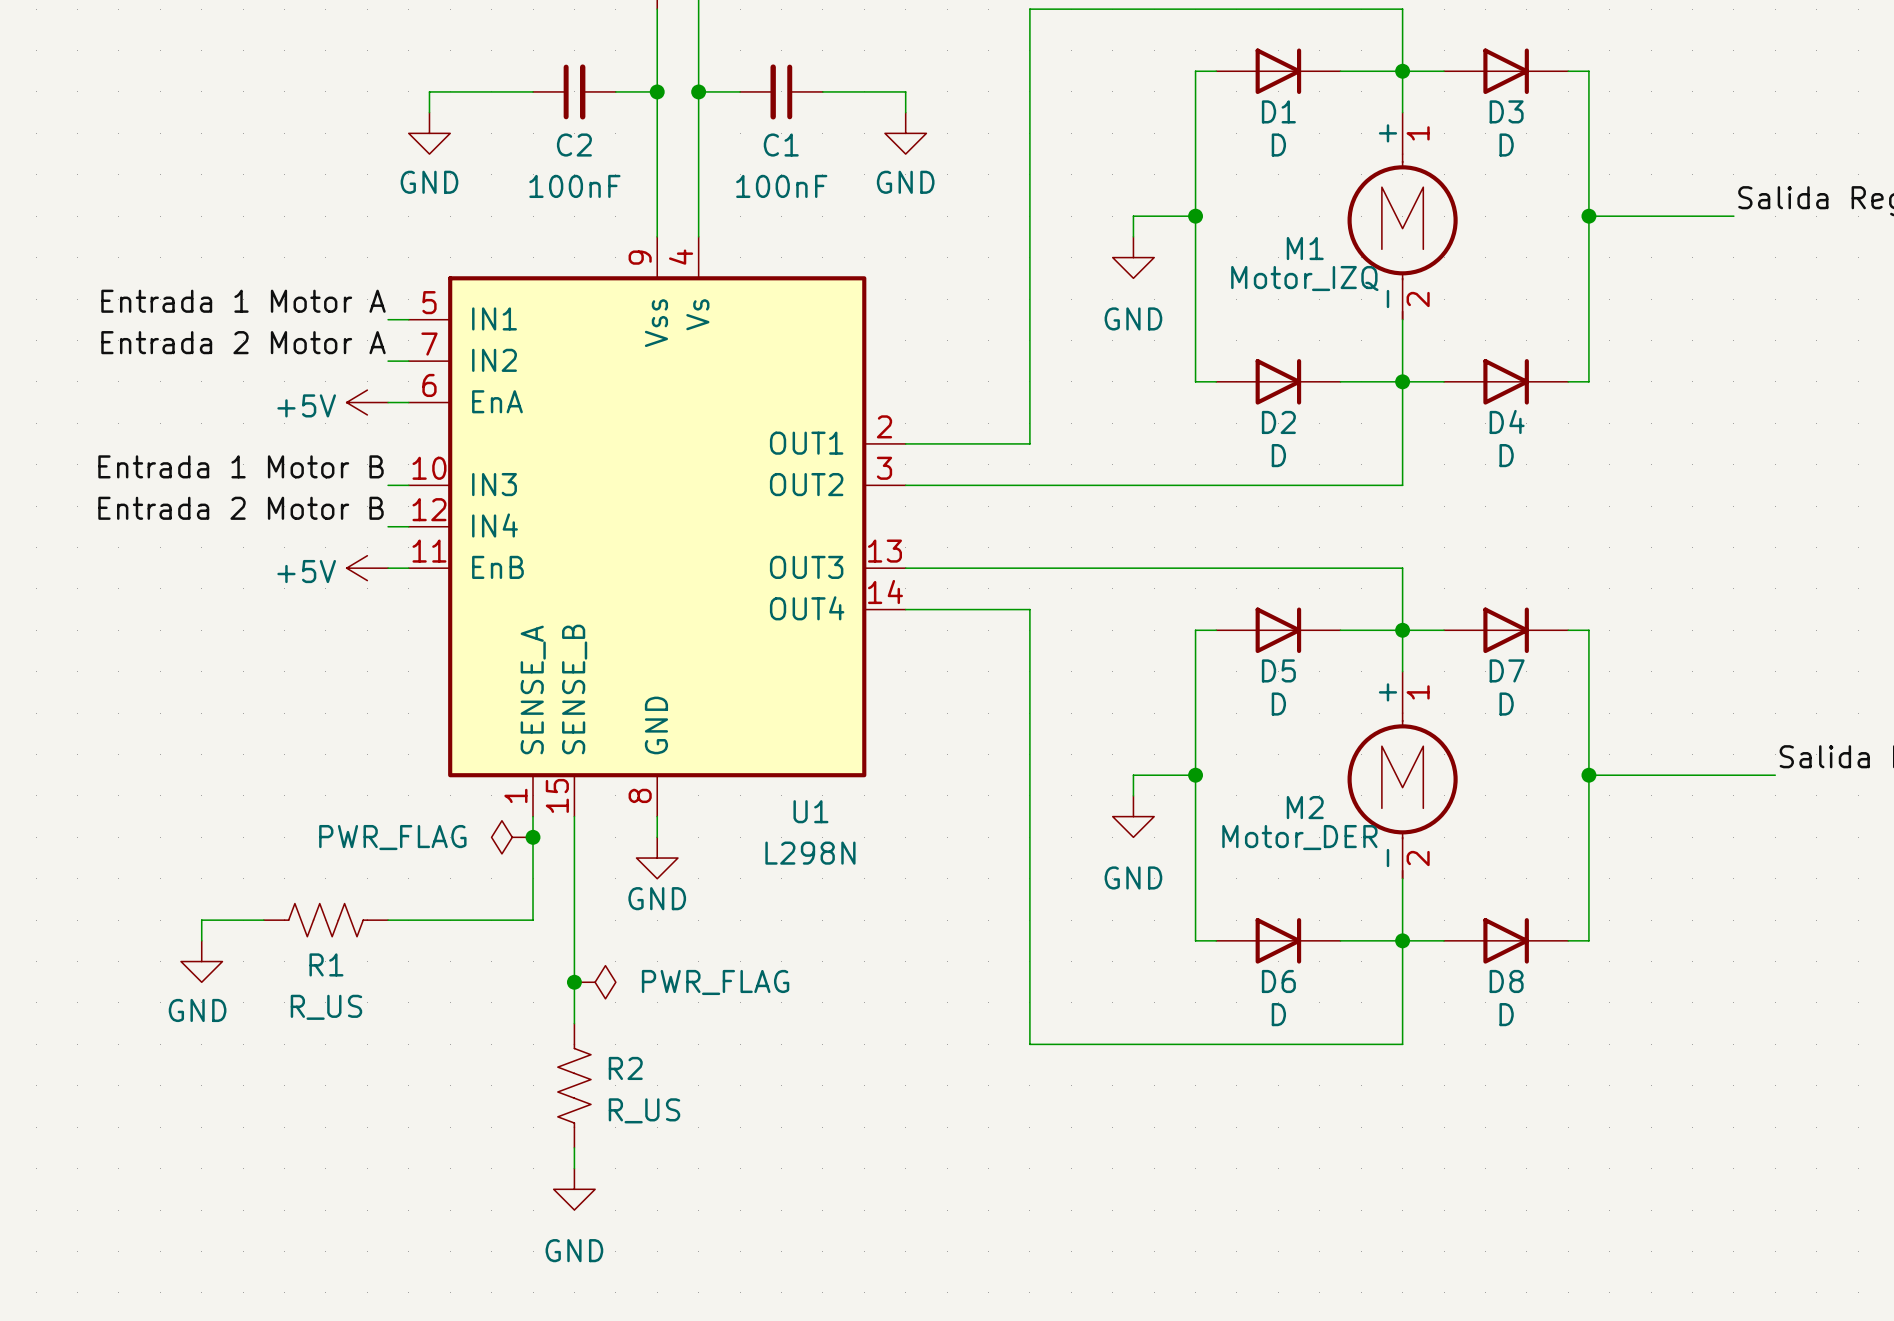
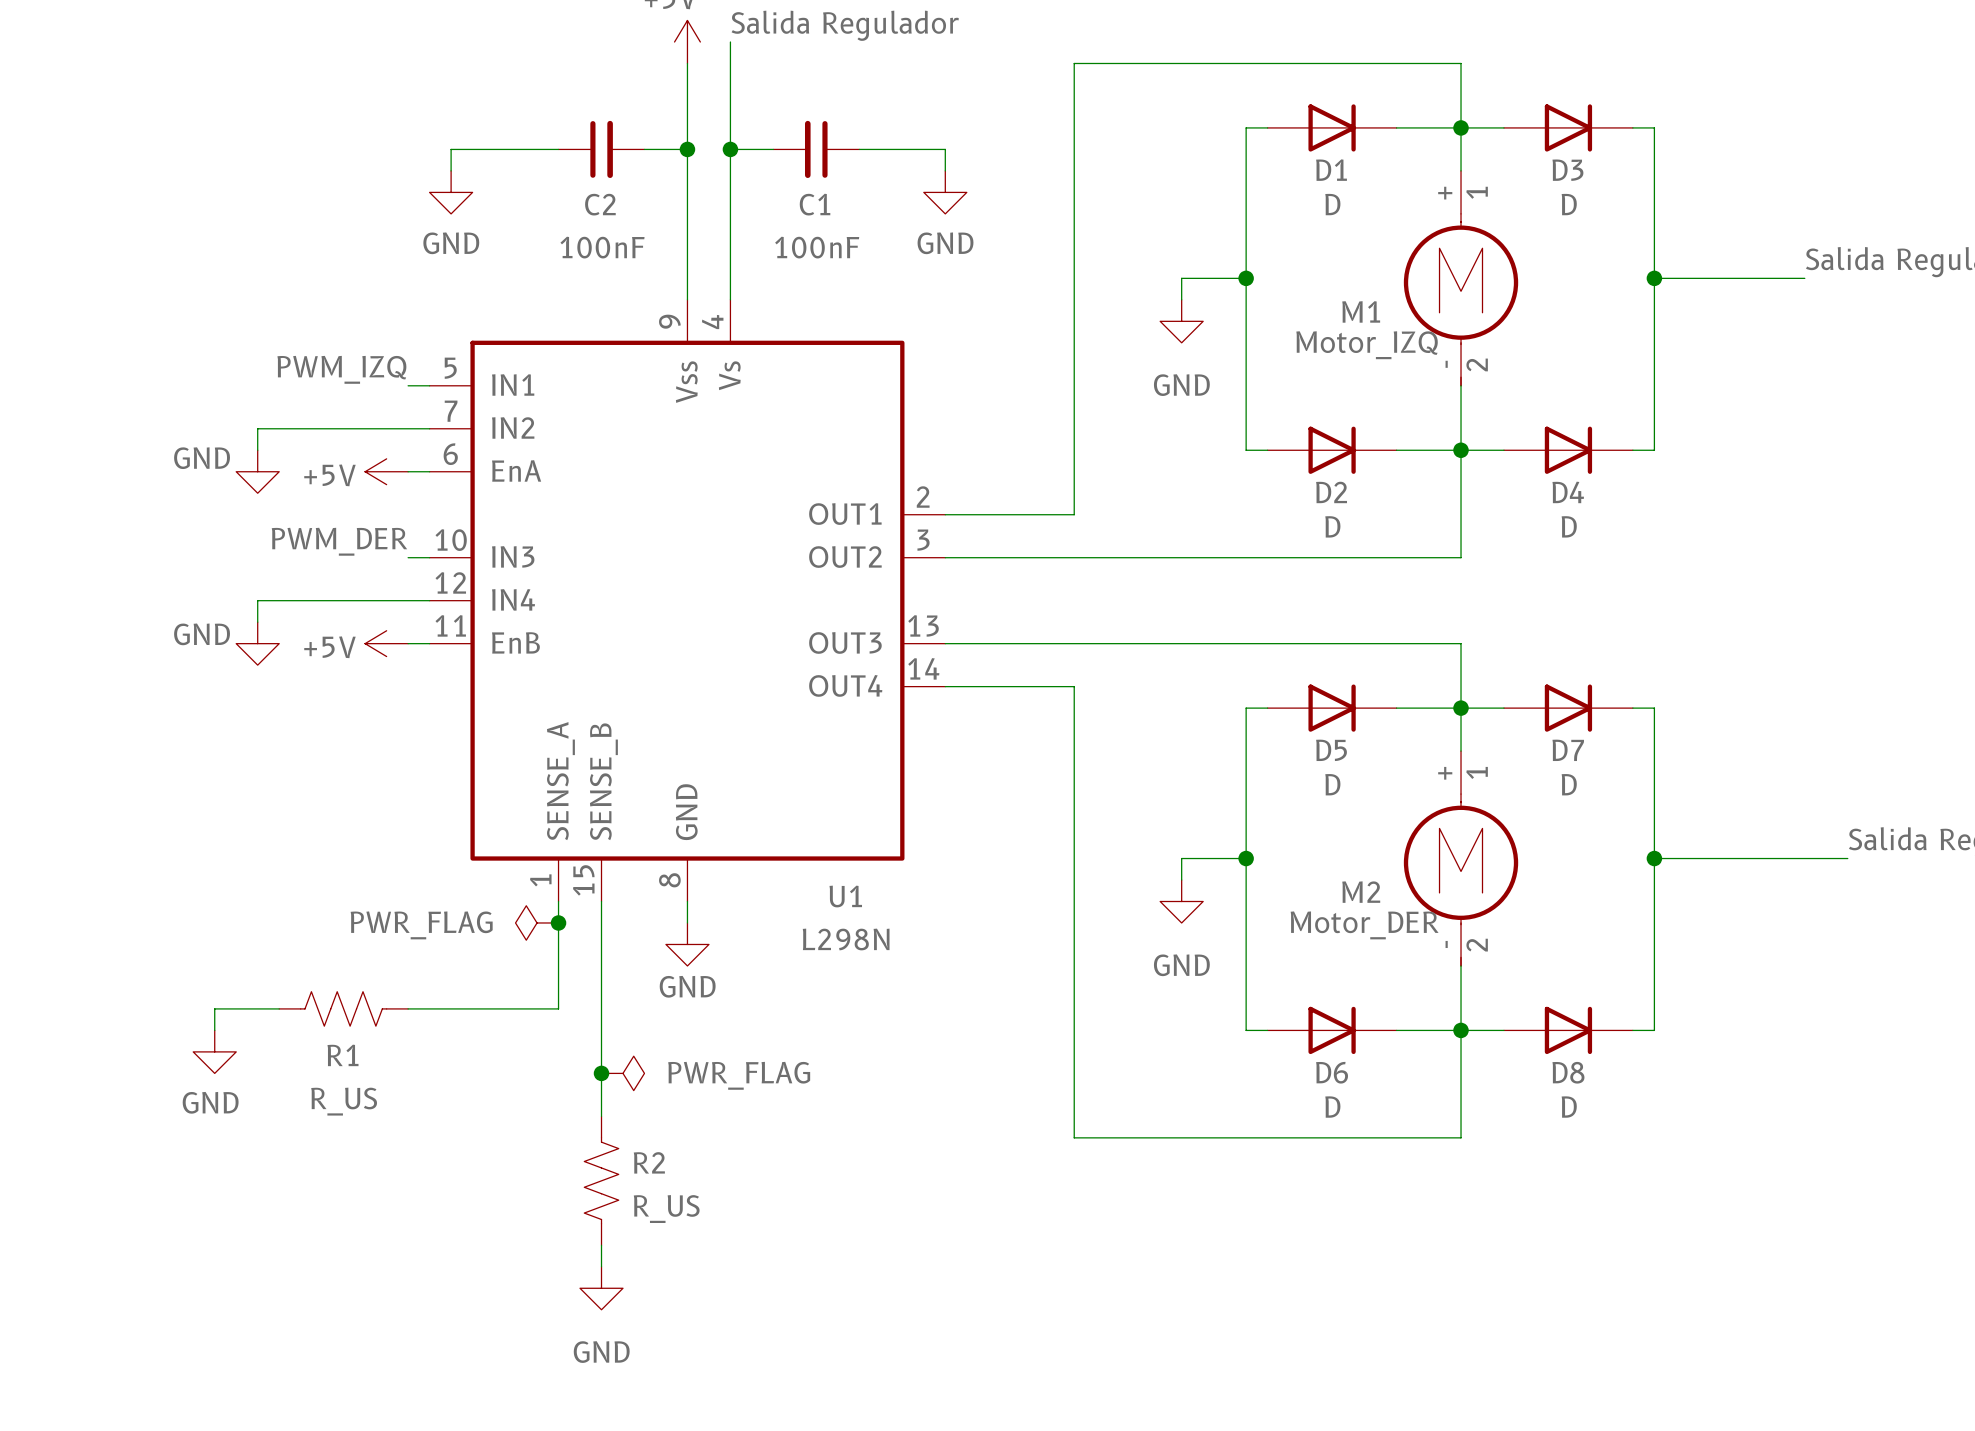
label: Entrada 1 Motor A (243, 301) -> PWM_IZQ (341, 369)
label: Entrada 2 Motor A (243, 342) -> none
wire: none -> (408, 428) (257, 428) (257, 450)
power symbol: none -> GND (257, 471)
label: Entrada 1 Motor B (241, 466) -> PWM_DER (339, 541)
label: Entrada 2 Motor B (241, 508) -> none
wire: none -> (408, 600) (257, 600) (257, 622)
power symbol: none -> GND (257, 643)

